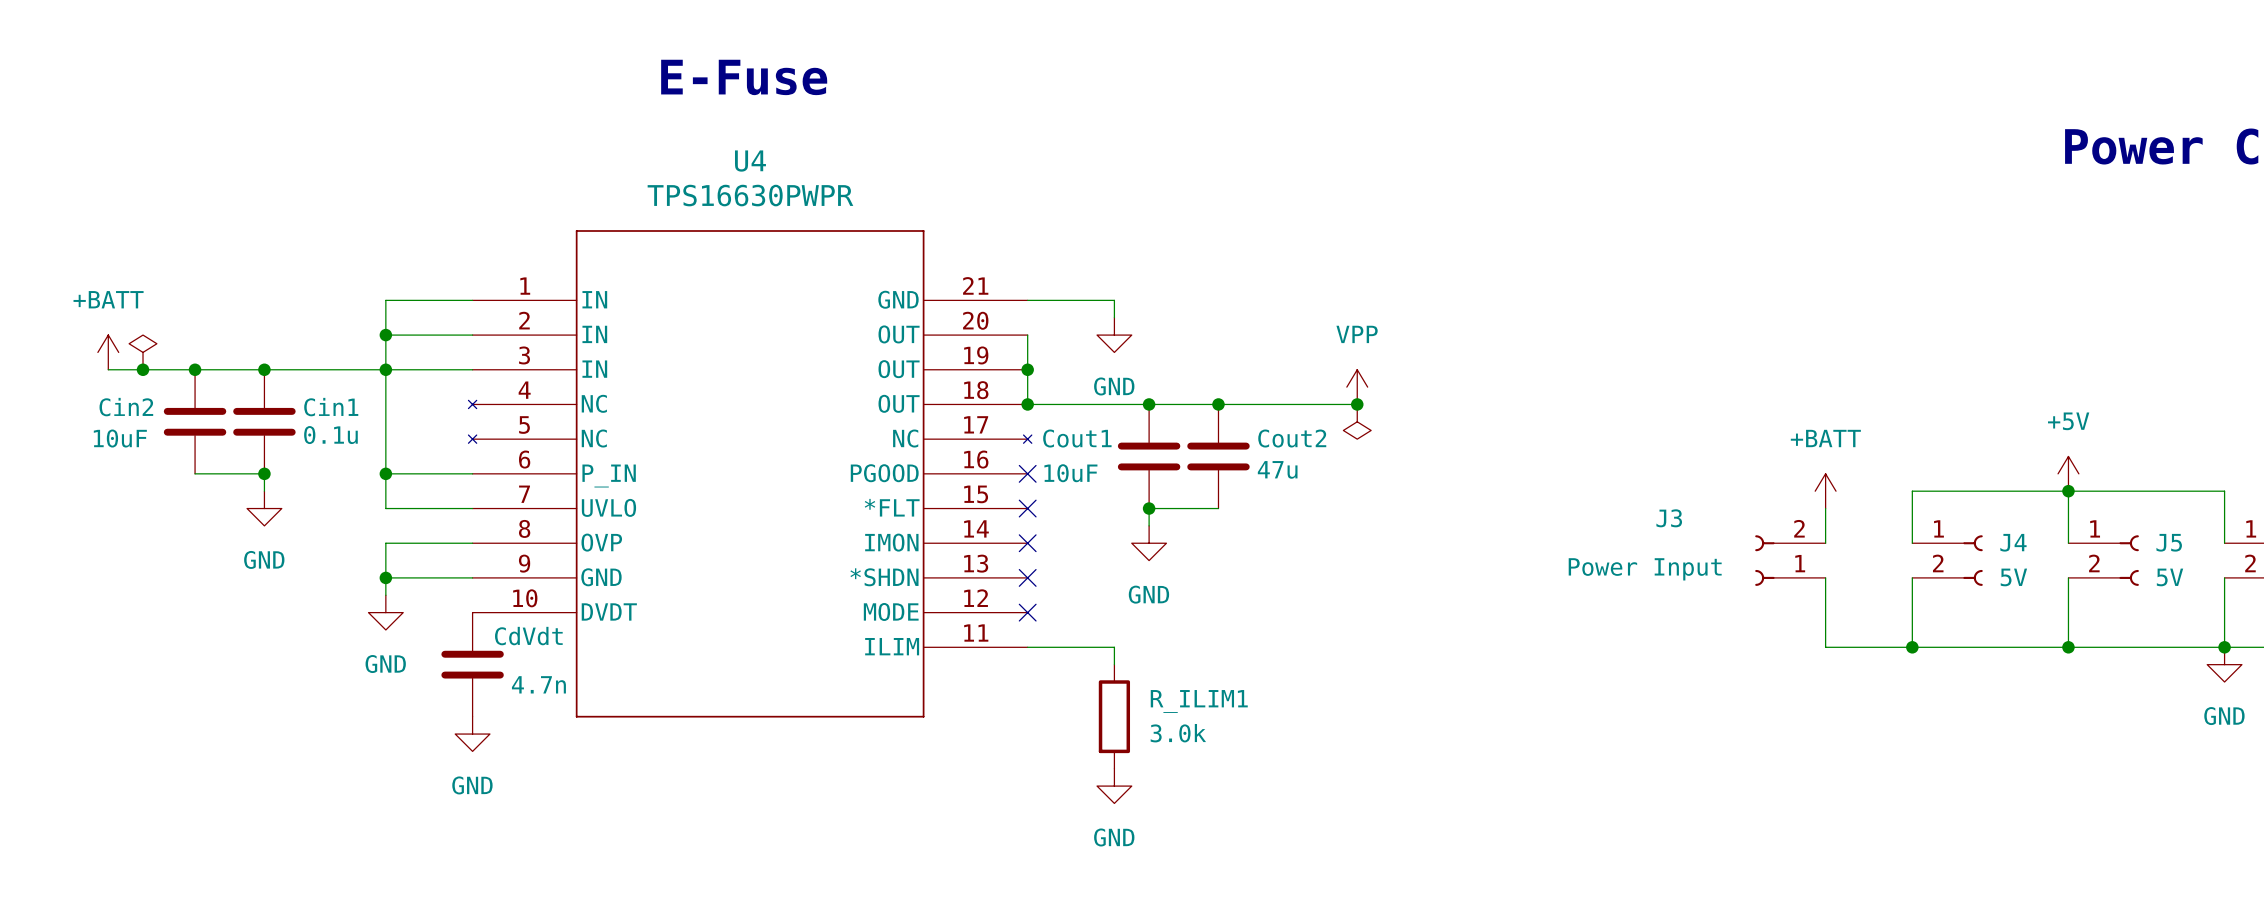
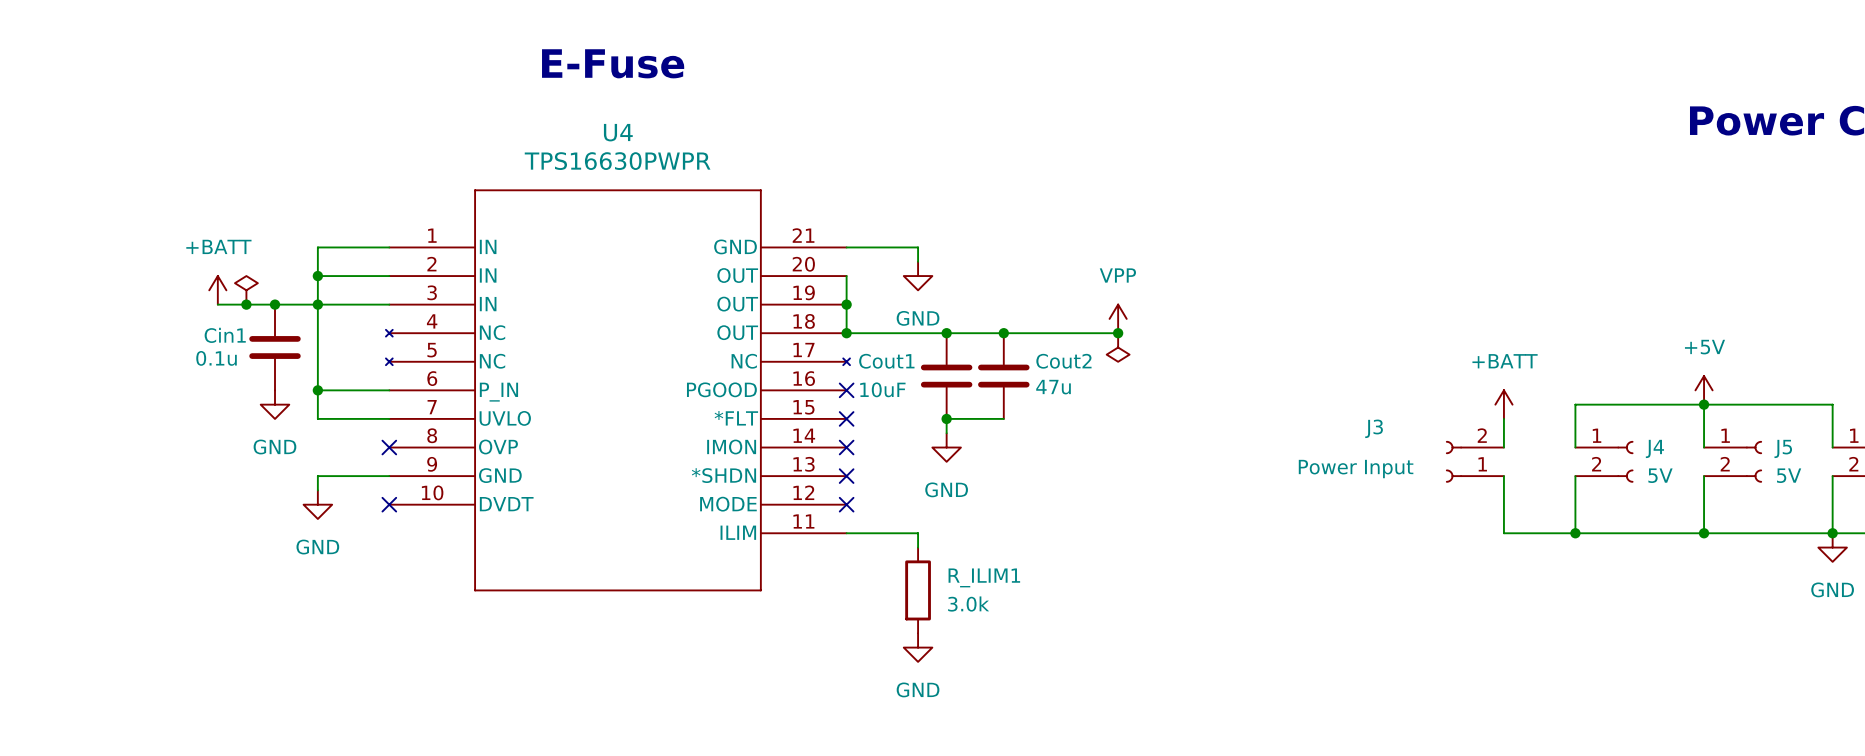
power symbol position: +BATT (108, 352) -> +BATT (217, 290)
power symbol position: (143, 352) -> (246, 290)
wire: (108, 369) (264, 369) -> none
junction: (143, 369) -> none
junction: (195, 369) -> none
junction: (264, 369) -> none
junction: none -> (246, 304)
junction: none -> (275, 304)
Cin1 name position: Cin1 (331, 407) -> Cin1 (225, 335)
Cin2: 10uF (195, 421) -> none
Cin1 position: (264, 421) -> (275, 347)
Cin1 value position: 0.1u (330, 435) -> 0.1u (216, 358)
wire: (195, 473) (264, 473) (264, 491) -> none
junction: (264, 473) -> none
power symbol position: GND (264, 508) -> GND (275, 404)
wire: (472, 543) (385, 543) (385, 577) -> none
no-connect mark: none -> (389, 447)
junction: (385, 577) -> none
no-connect mark: none -> (389, 504)
CdVdt: 4.7n (472, 664) -> none
power symbol: GND (472, 734) -> none

